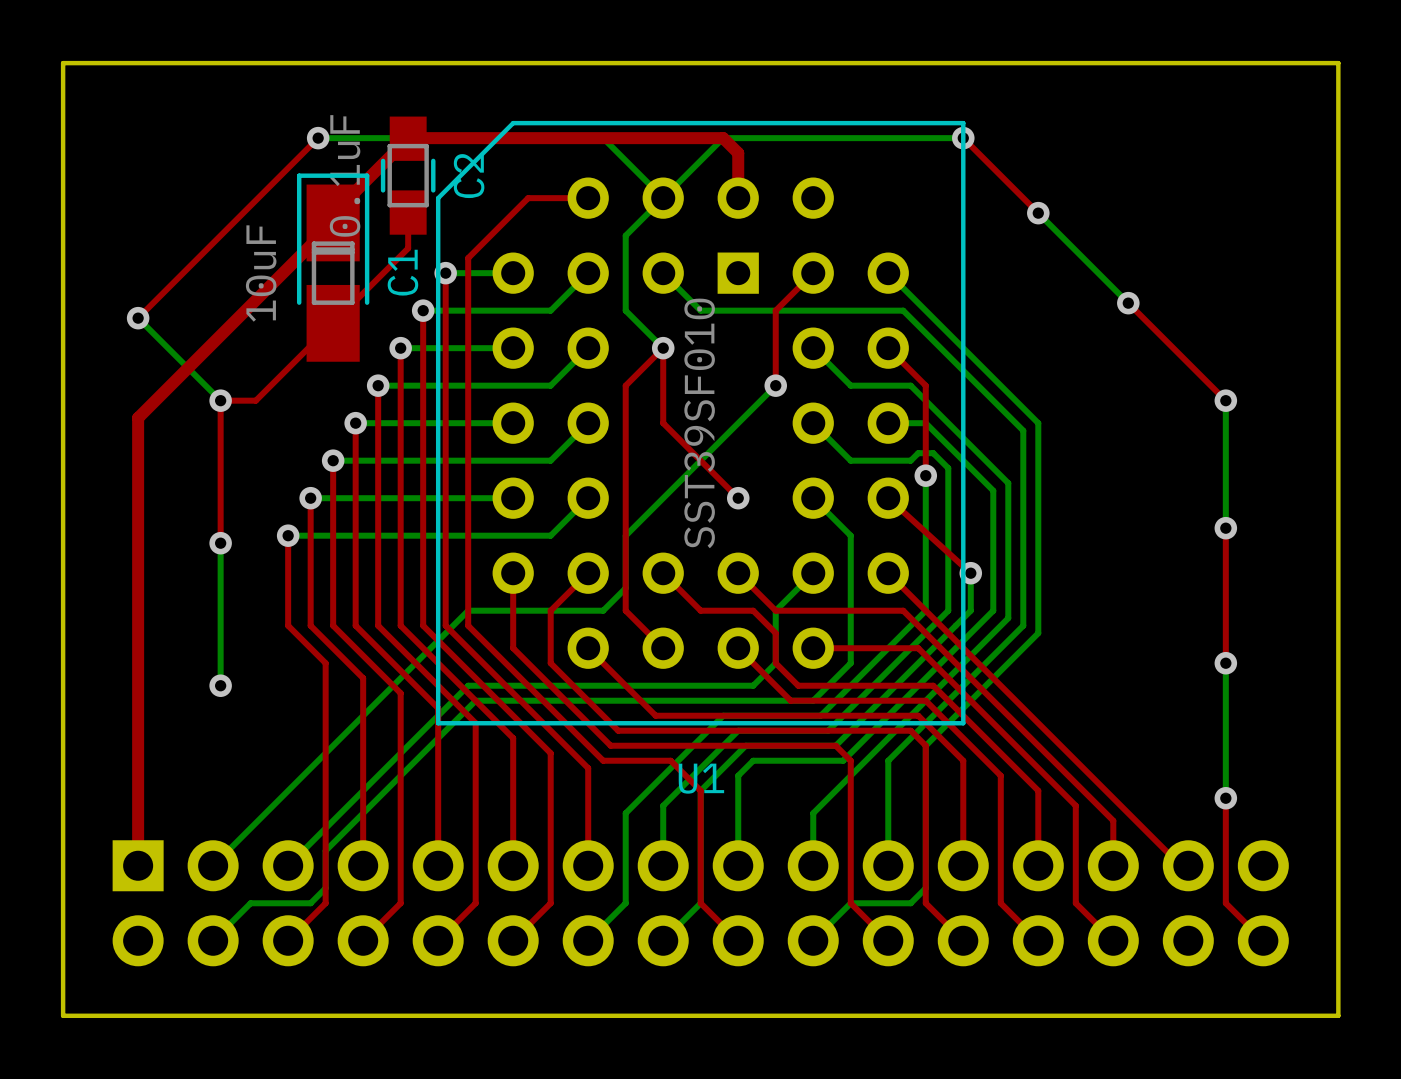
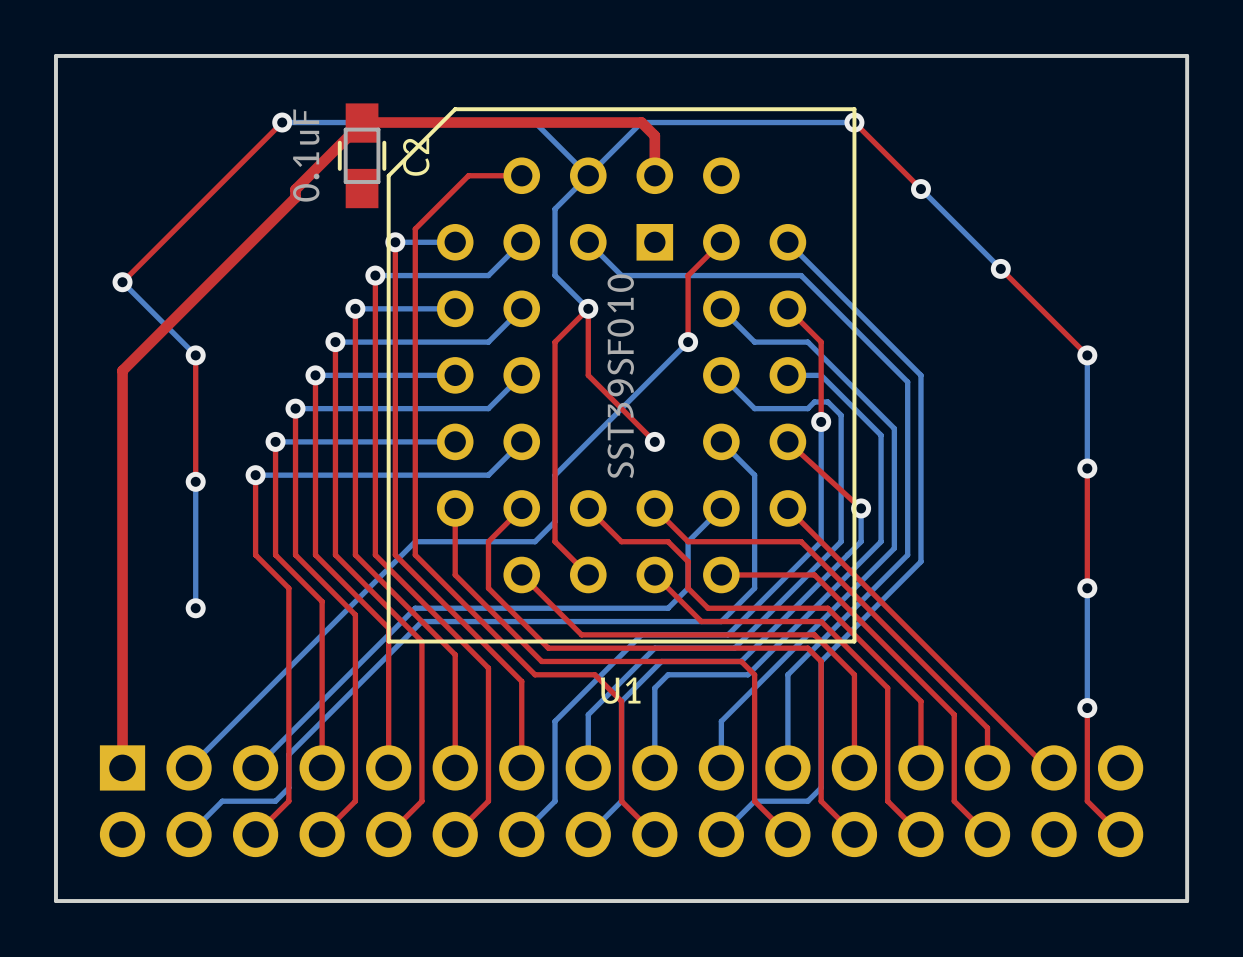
top track: (408, 212) (408, 248) (255, 400) (220, 400) -> none
C1: 10uF (333, 267) -> none

